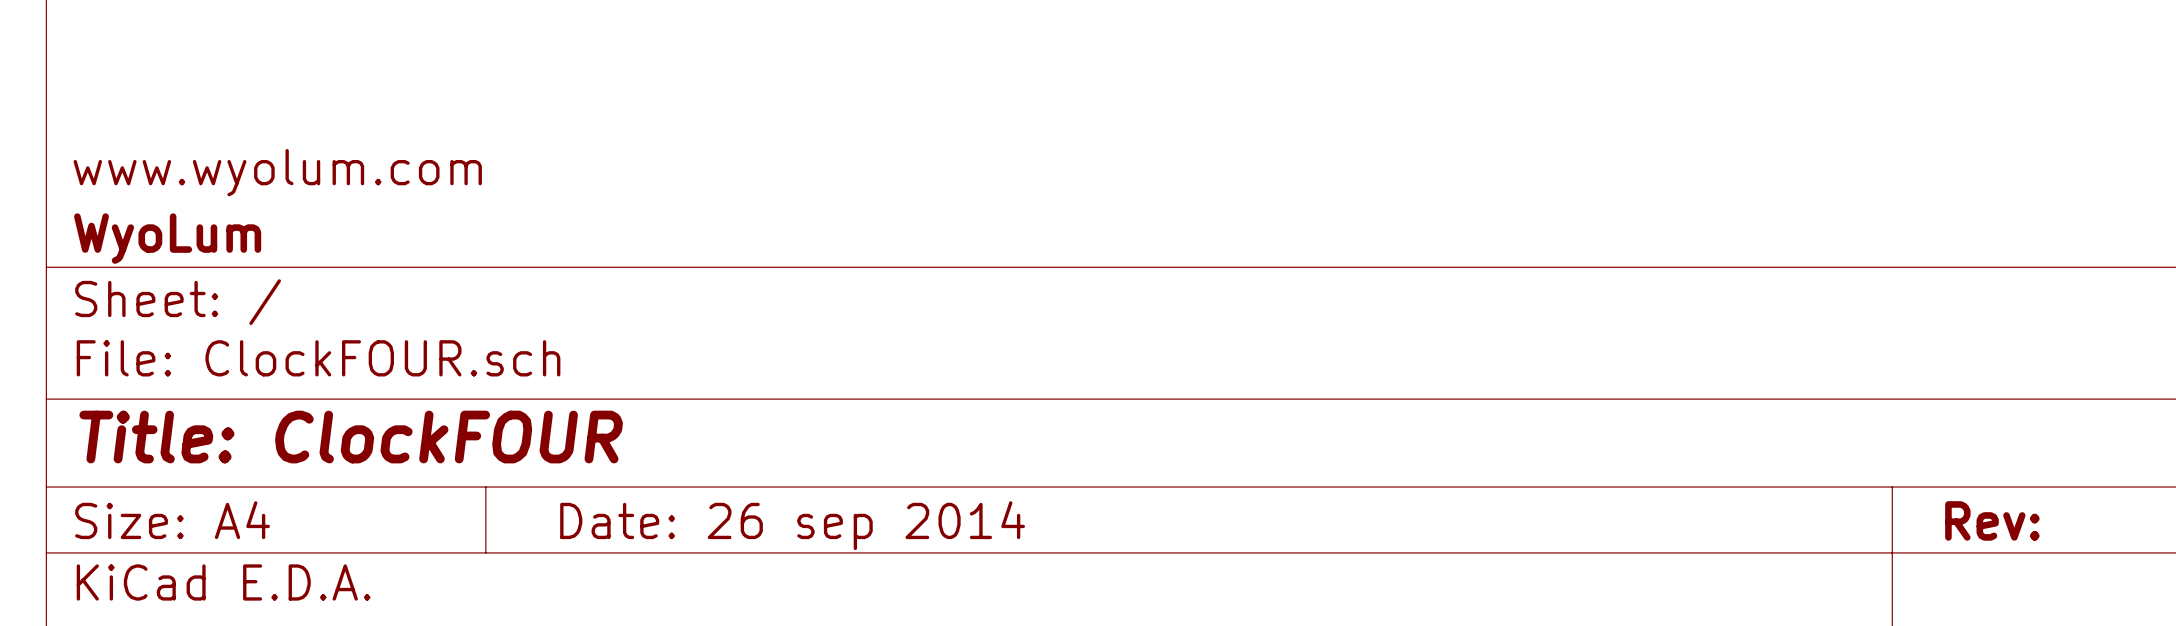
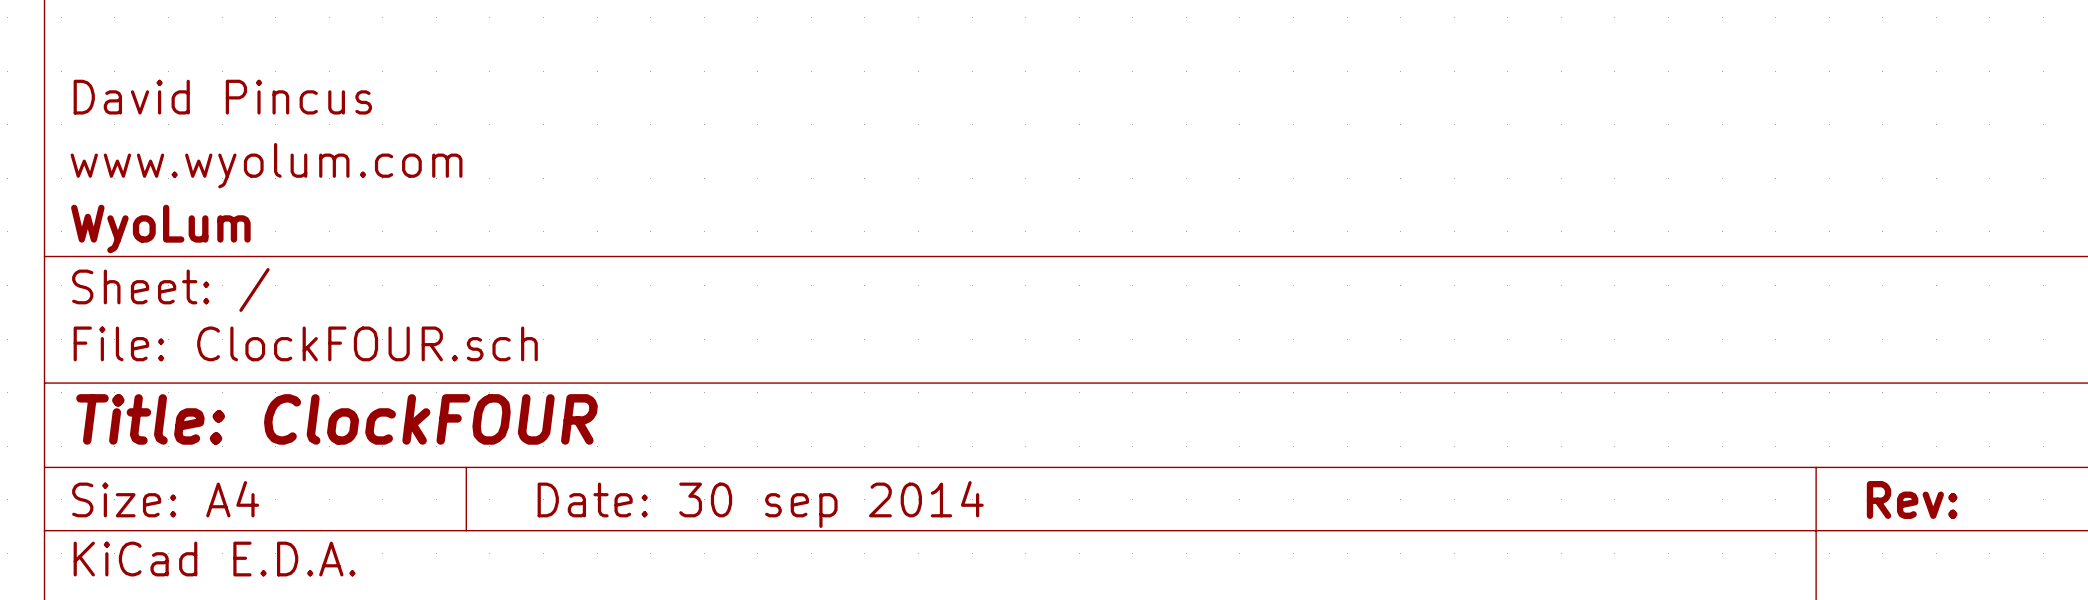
title block: none -> David Pincus (222, 97)
title block: Date: 26 sep 2014 (792, 525) -> Date: 30 sep 2014 (760, 504)

